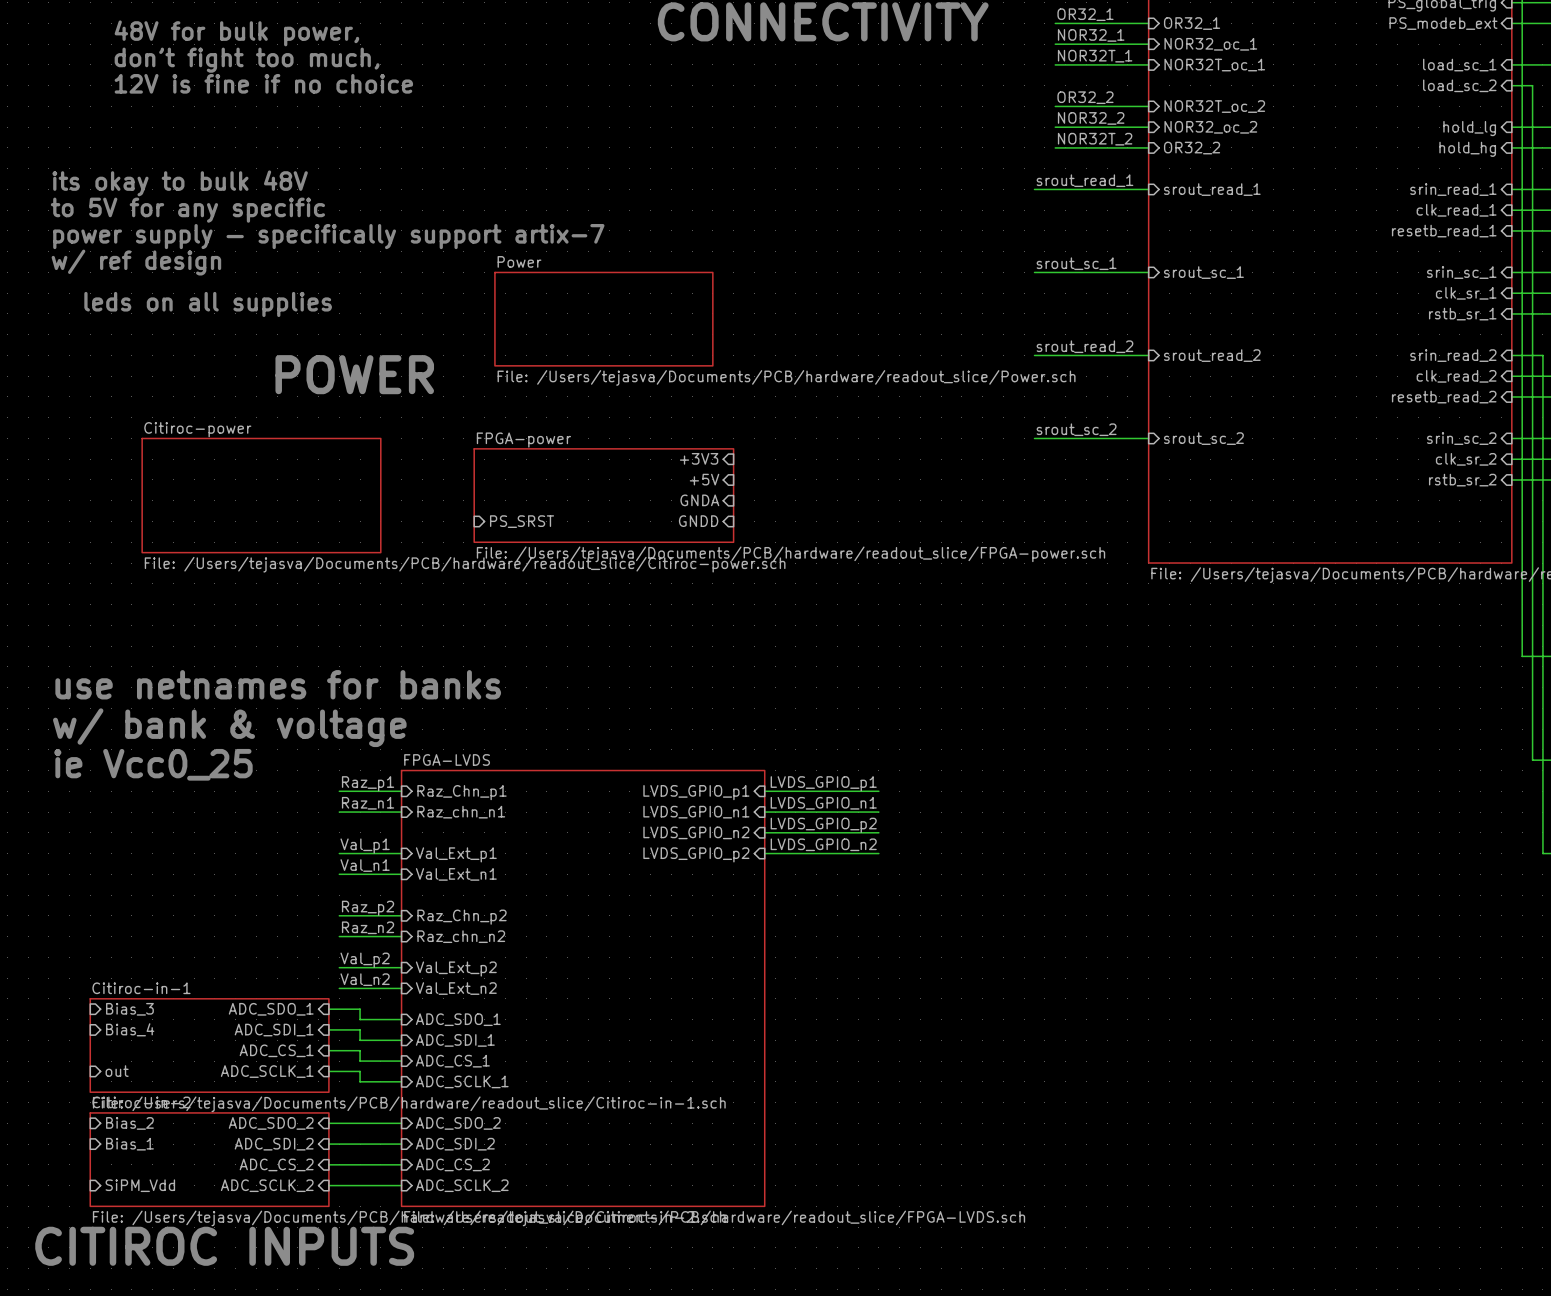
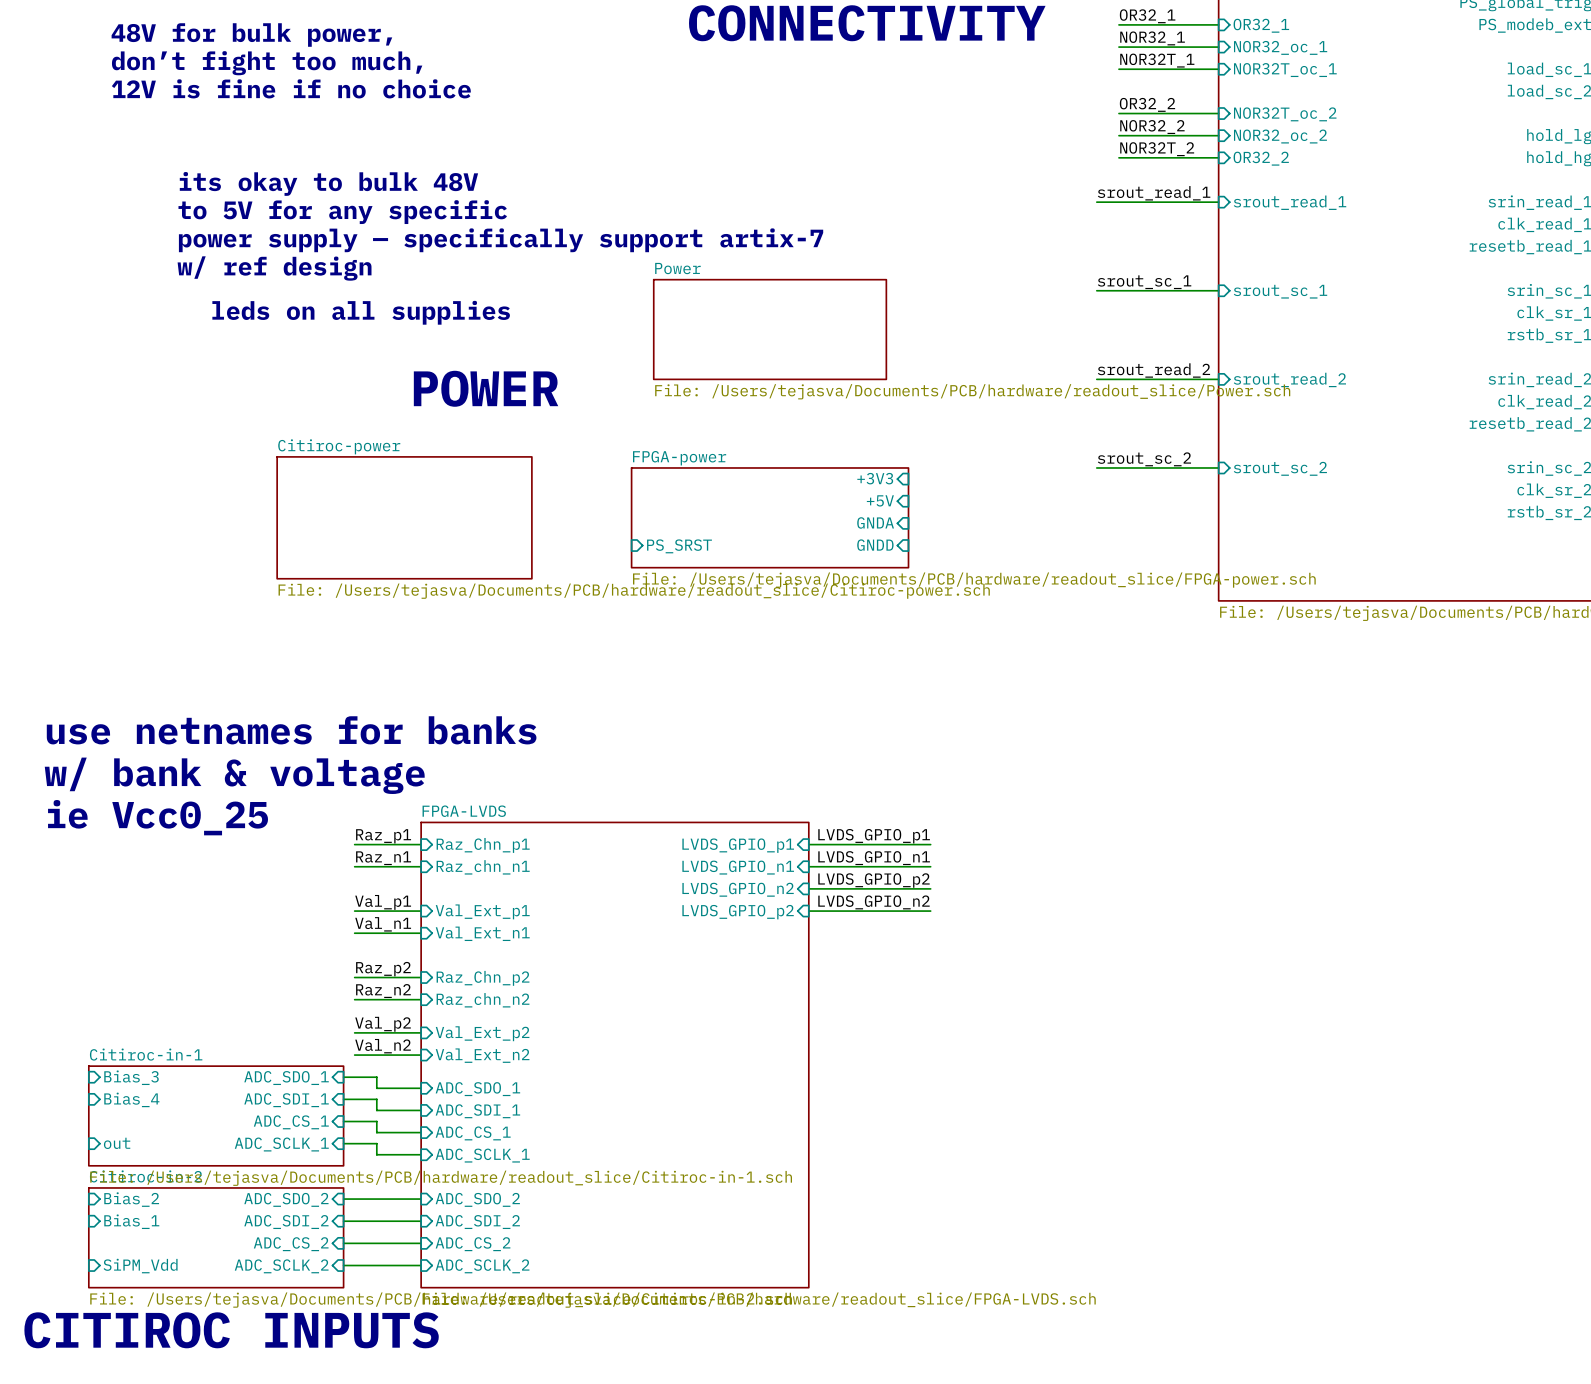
text position: its okay to bulk 48V (180, 183) -> its okay to bulk 48V (328, 183)
text position: to 5V for any specific (187, 210) -> to 5V for any specific (342, 212)
text position: power supply — specifically support artix-7 (328, 236) -> power supply — specifically support artix-7 (501, 240)
text position: w/ ref design (136, 262) -> w/ ref design (274, 268)
text position: leds on all supplies (208, 304) -> leds on all supplies (361, 312)
sheet Power position: (603, 319) -> (770, 329)
text position: POWER (354, 374) -> POWER (486, 388)
sheet pin position: +3V3 (699, 458) -> +3V3 (875, 478)
sheet pin position: +5V (704, 479) -> +5V (880, 500)
sheet Citiroc-power position: (261, 495) -> (404, 517)
sheet FPGA-power position: (603, 495) -> (770, 517)
sheet pin position: GNDA (699, 500) -> GNDA (875, 522)
sheet pin position: PS_SRST (522, 521) -> PS_SRST (679, 546)
sheet pin position: GNDD (698, 521) -> GNDD (875, 545)

